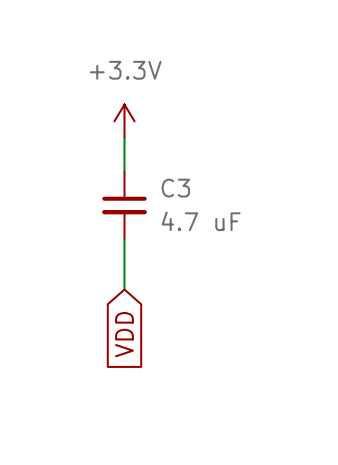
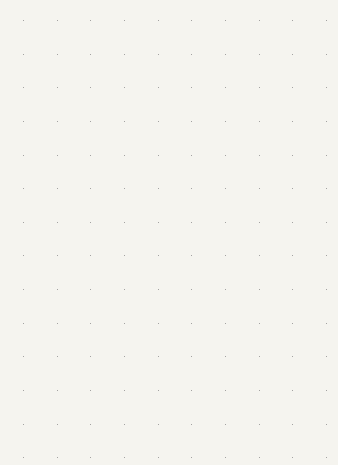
power symbol: +3.3V (124, 121) -> none
wire: (124, 138) (124, 171) -> none
C3: 4.7 uF (124, 205) -> none
wire: (124, 239) (124, 289) -> none
global label: VDD (124, 334) -> none

